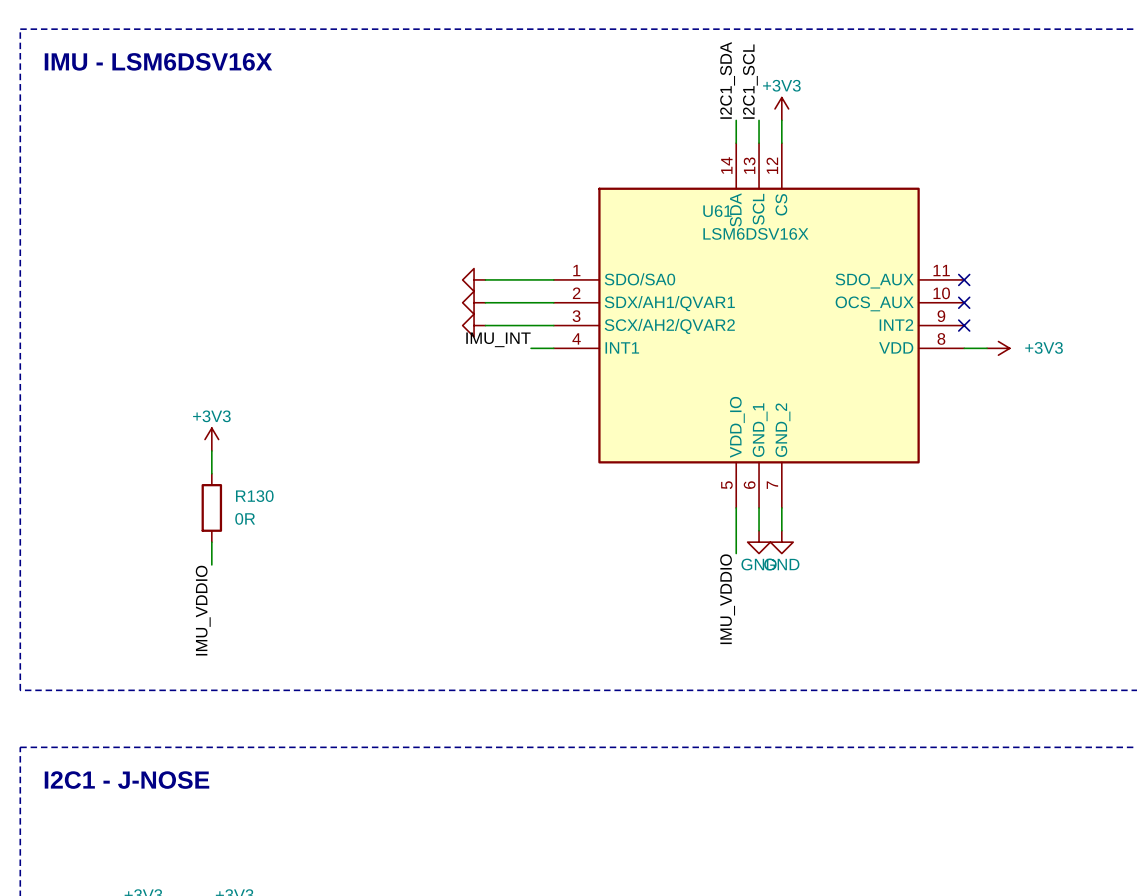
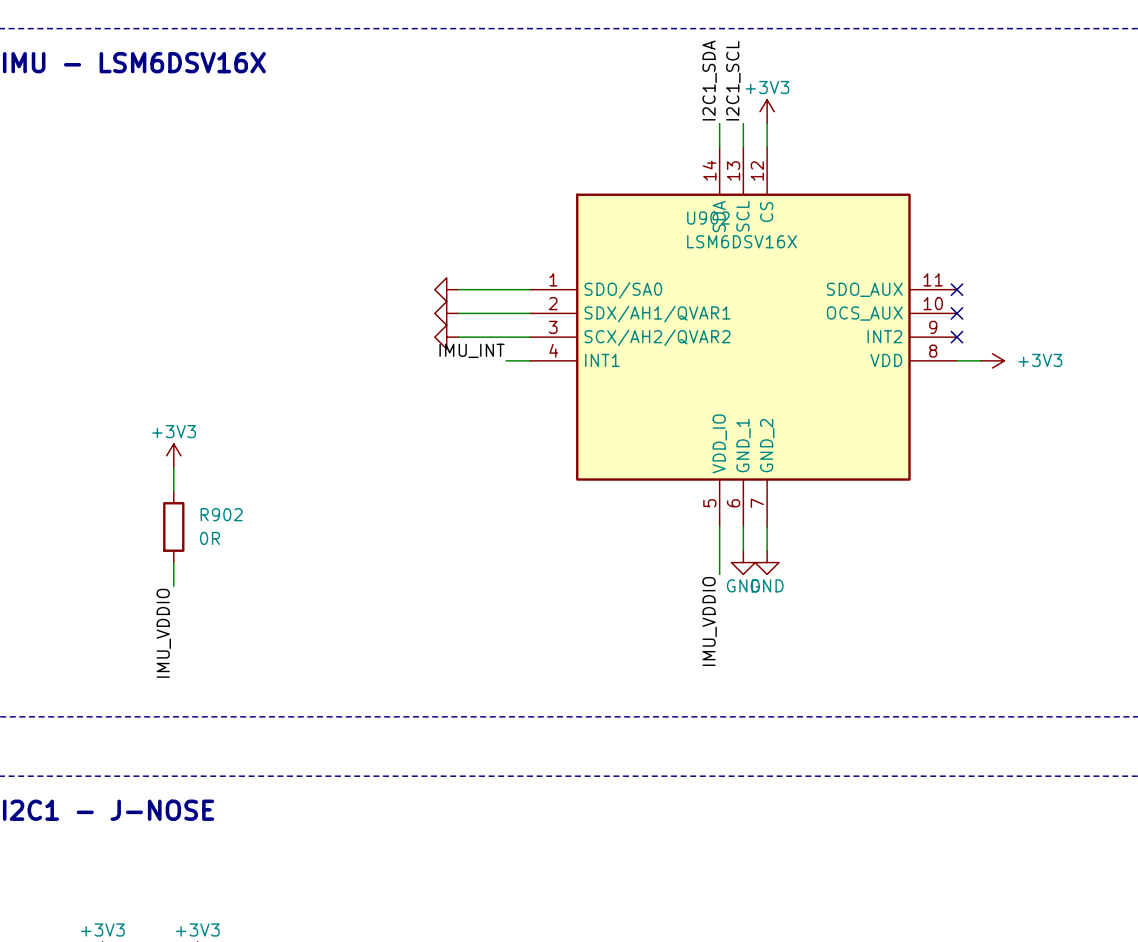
U61 name: U61 (717, 211) -> U902 (708, 218)
R130 name: R130 (254, 496) -> R902 (221, 514)

